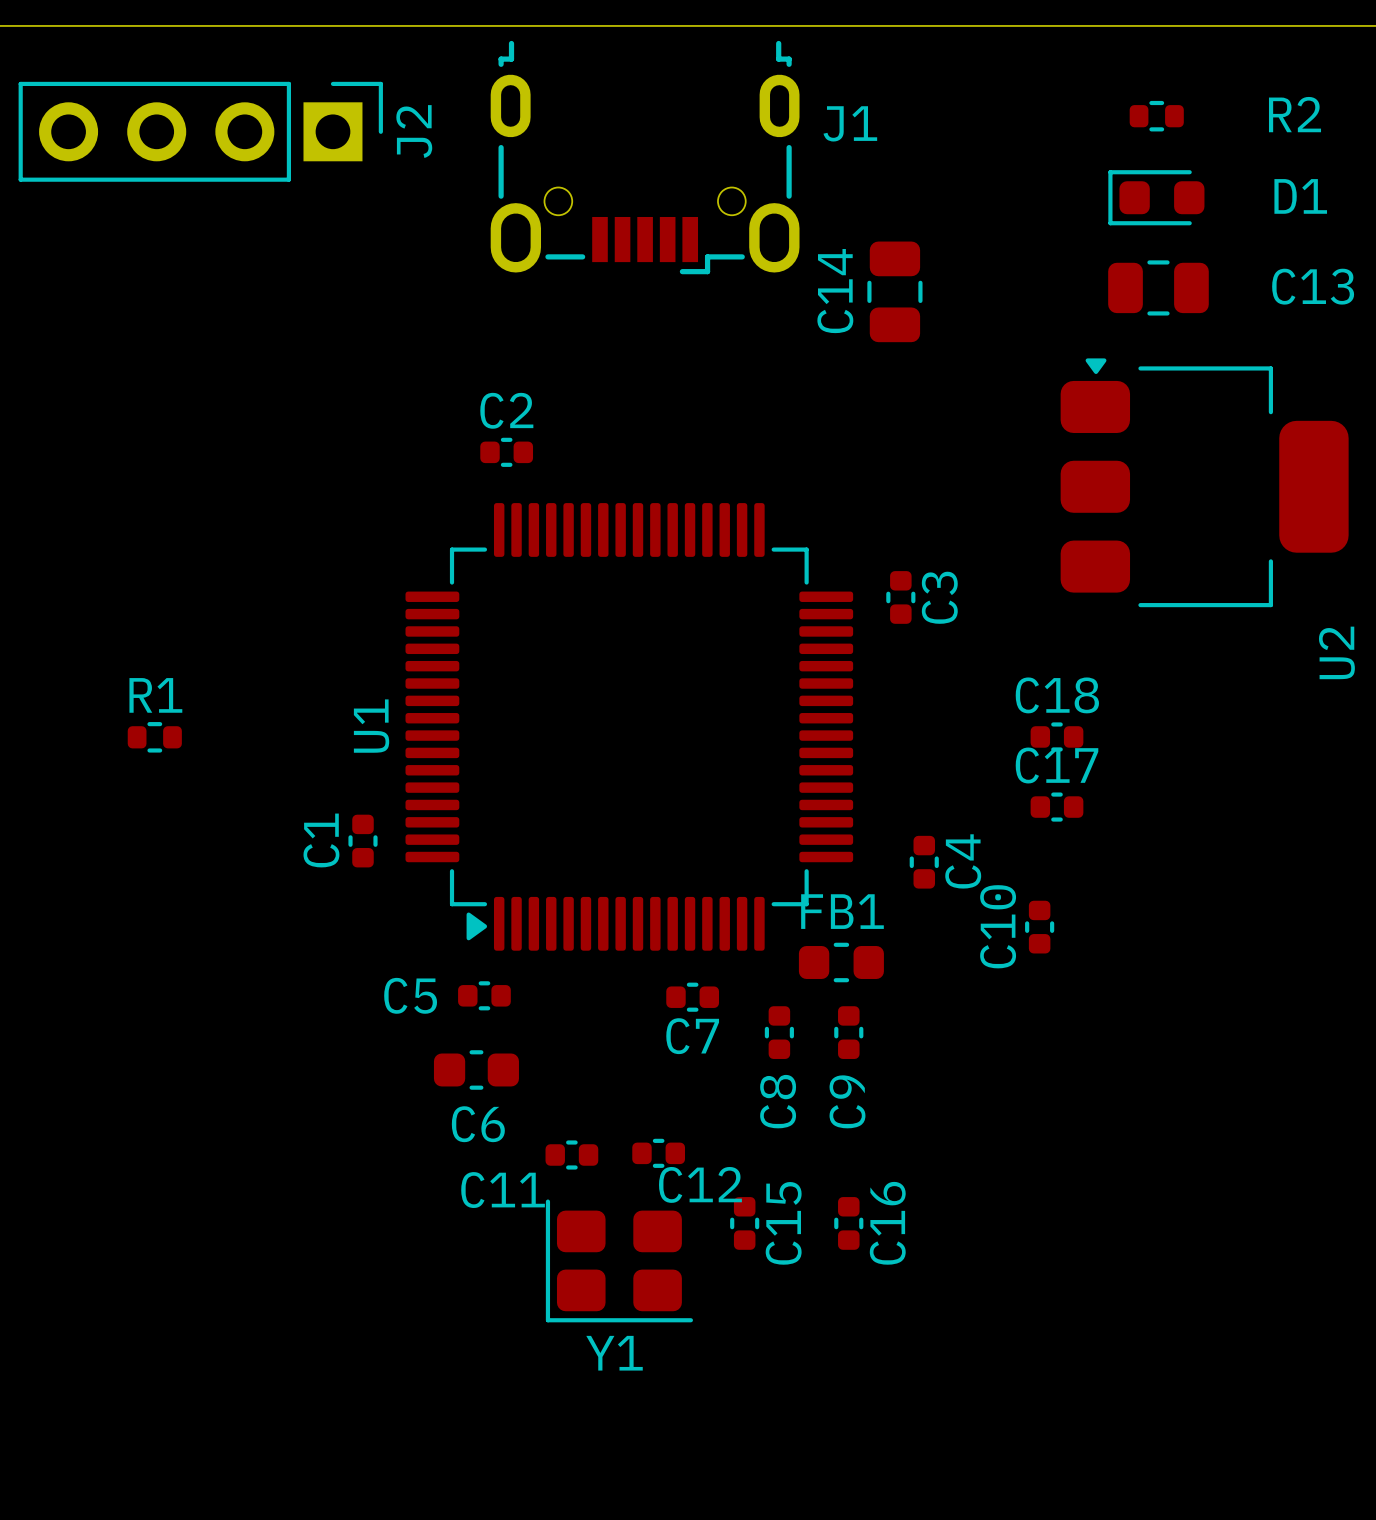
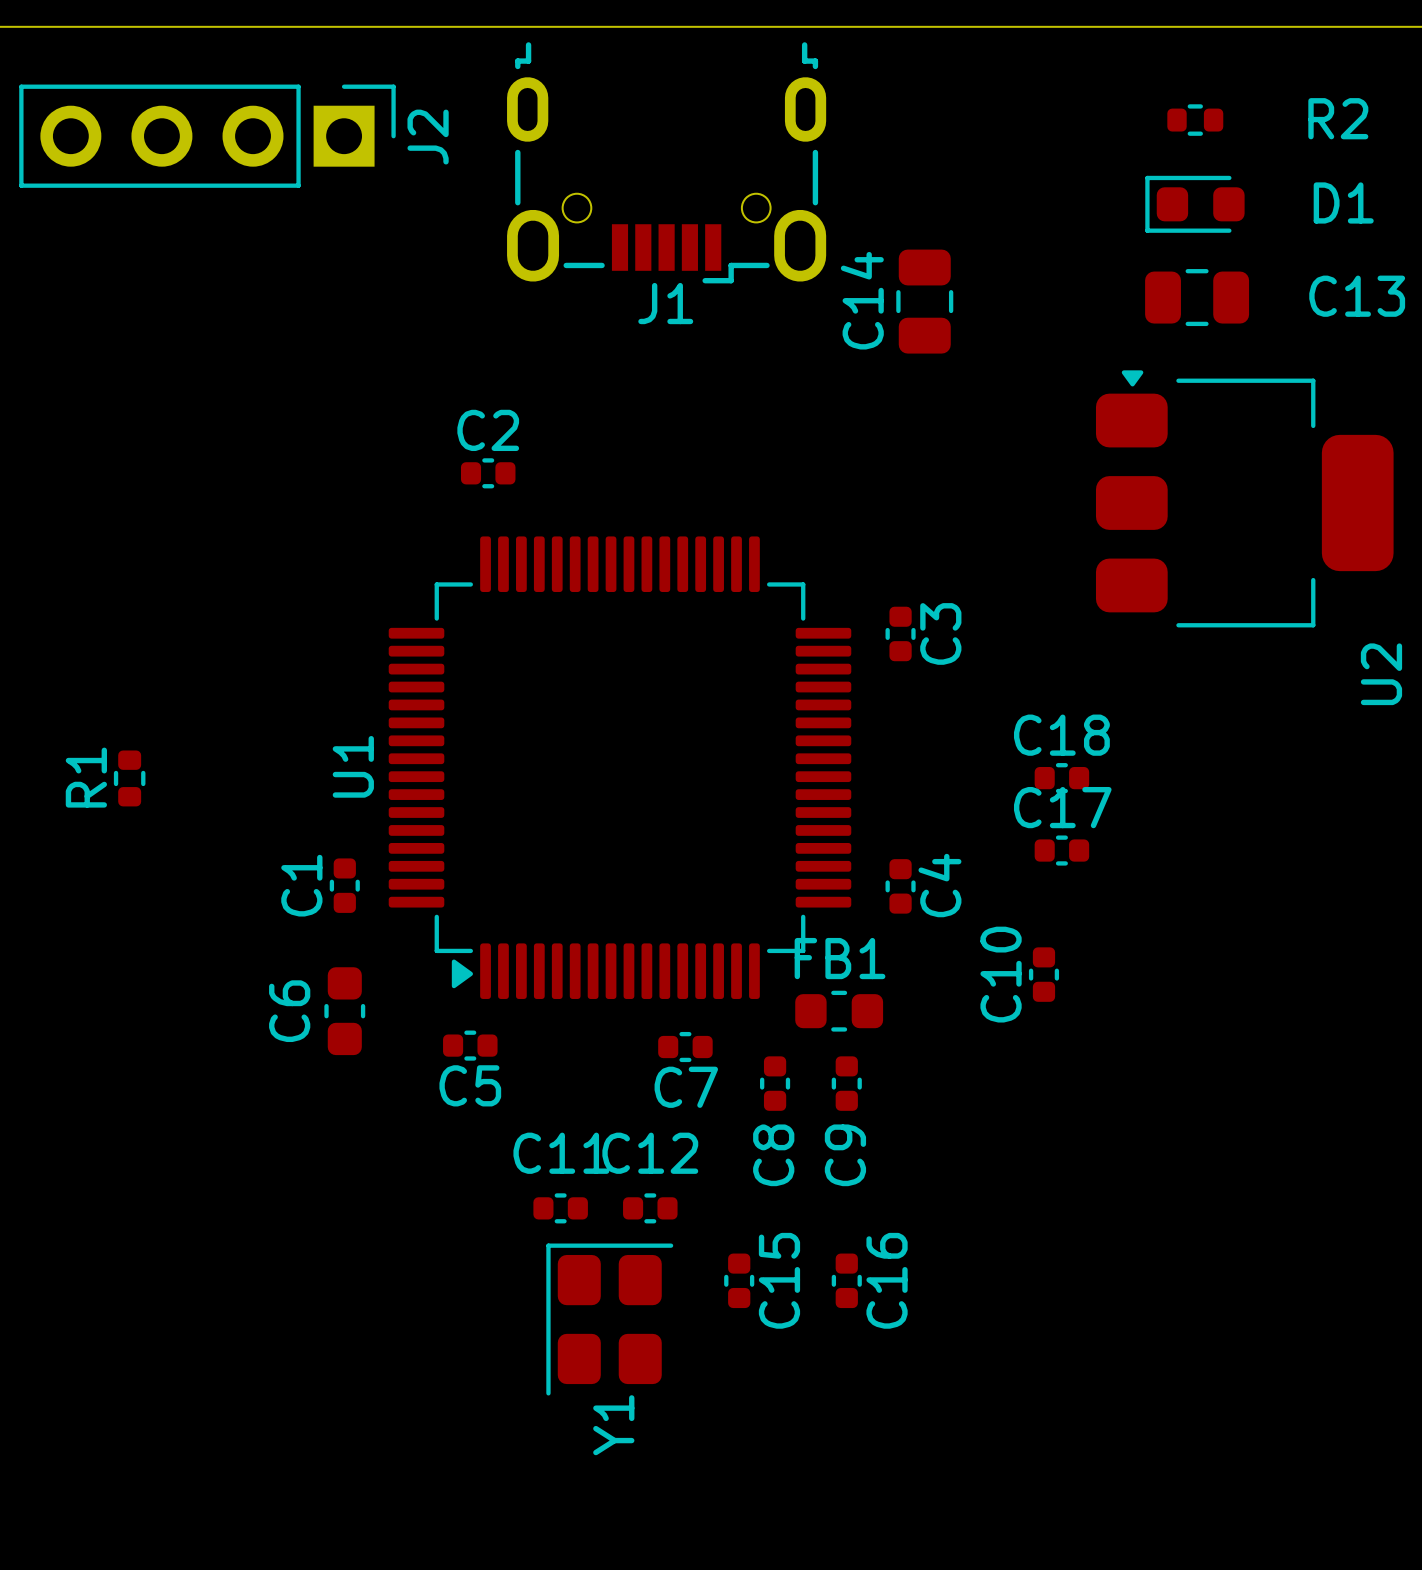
J1 name position: J1 (850, 123) -> J1 (665, 303)
C2 position: (506, 452) -> (488, 473)
C3 position: (900, 597) -> (900, 633)
U1 position: (629, 726) -> (619, 767)
C18 position: (1056, 736) -> (1061, 778)
R1 rotation: 0° (154, 737) -> 90° clockwise (129, 778)
R1 position: (154, 737) -> (129, 778)
C17 position: (1056, 807) -> (1061, 850)
C1 position: (363, 841) -> (344, 885)
C4 position: (924, 862) -> (900, 886)
C10 position: (1039, 927) -> (1043, 974)
FB1 position: (841, 962) -> (839, 1011)
C5 name position: C5 (410, 995) -> C5 (470, 1085)
C5 position: (484, 995) -> (470, 1045)
C7 position: (692, 997) -> (685, 1047)
C8 position: (779, 1032) -> (775, 1083)
C9 position: (848, 1032) -> (846, 1083)
C6 rotation: 0° (476, 1069) -> 90° clockwise (344, 1011)
C6 position: (476, 1069) -> (344, 1011)
C12 position: (658, 1153) -> (650, 1208)
C11 position: (571, 1154) -> (560, 1208)
C12 name position: C12 (700, 1184) -> C12 (650, 1153)
C11 name position: C11 (503, 1190) -> C11 (561, 1153)
C15 position: (744, 1223) -> (739, 1280)
C16 position: (848, 1223) -> (846, 1280)
Y1 rotation: 0° (619, 1260) -> 90° clockwise (609, 1319)

